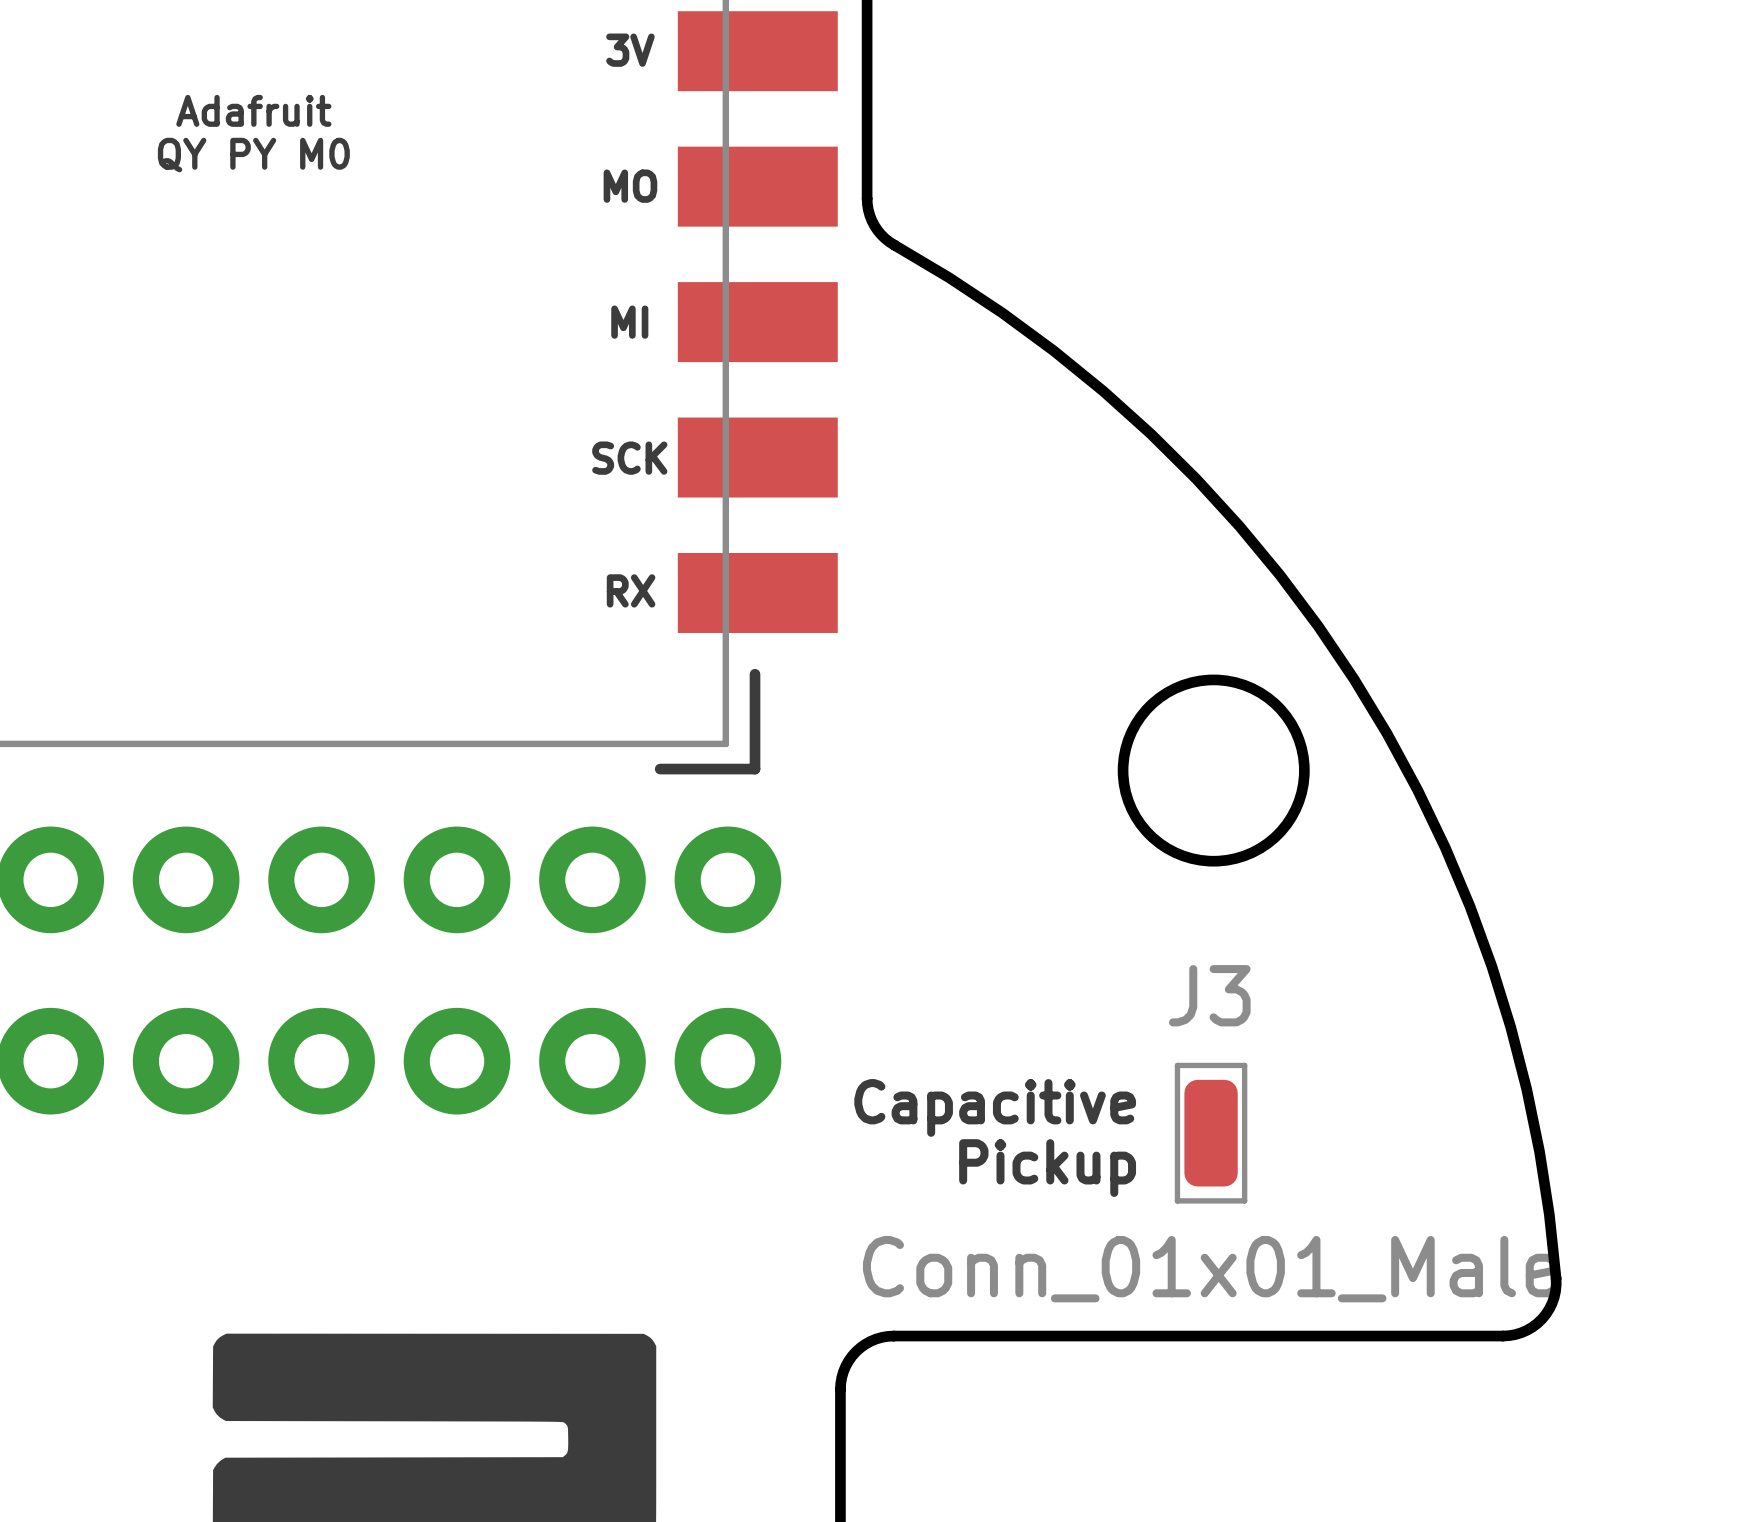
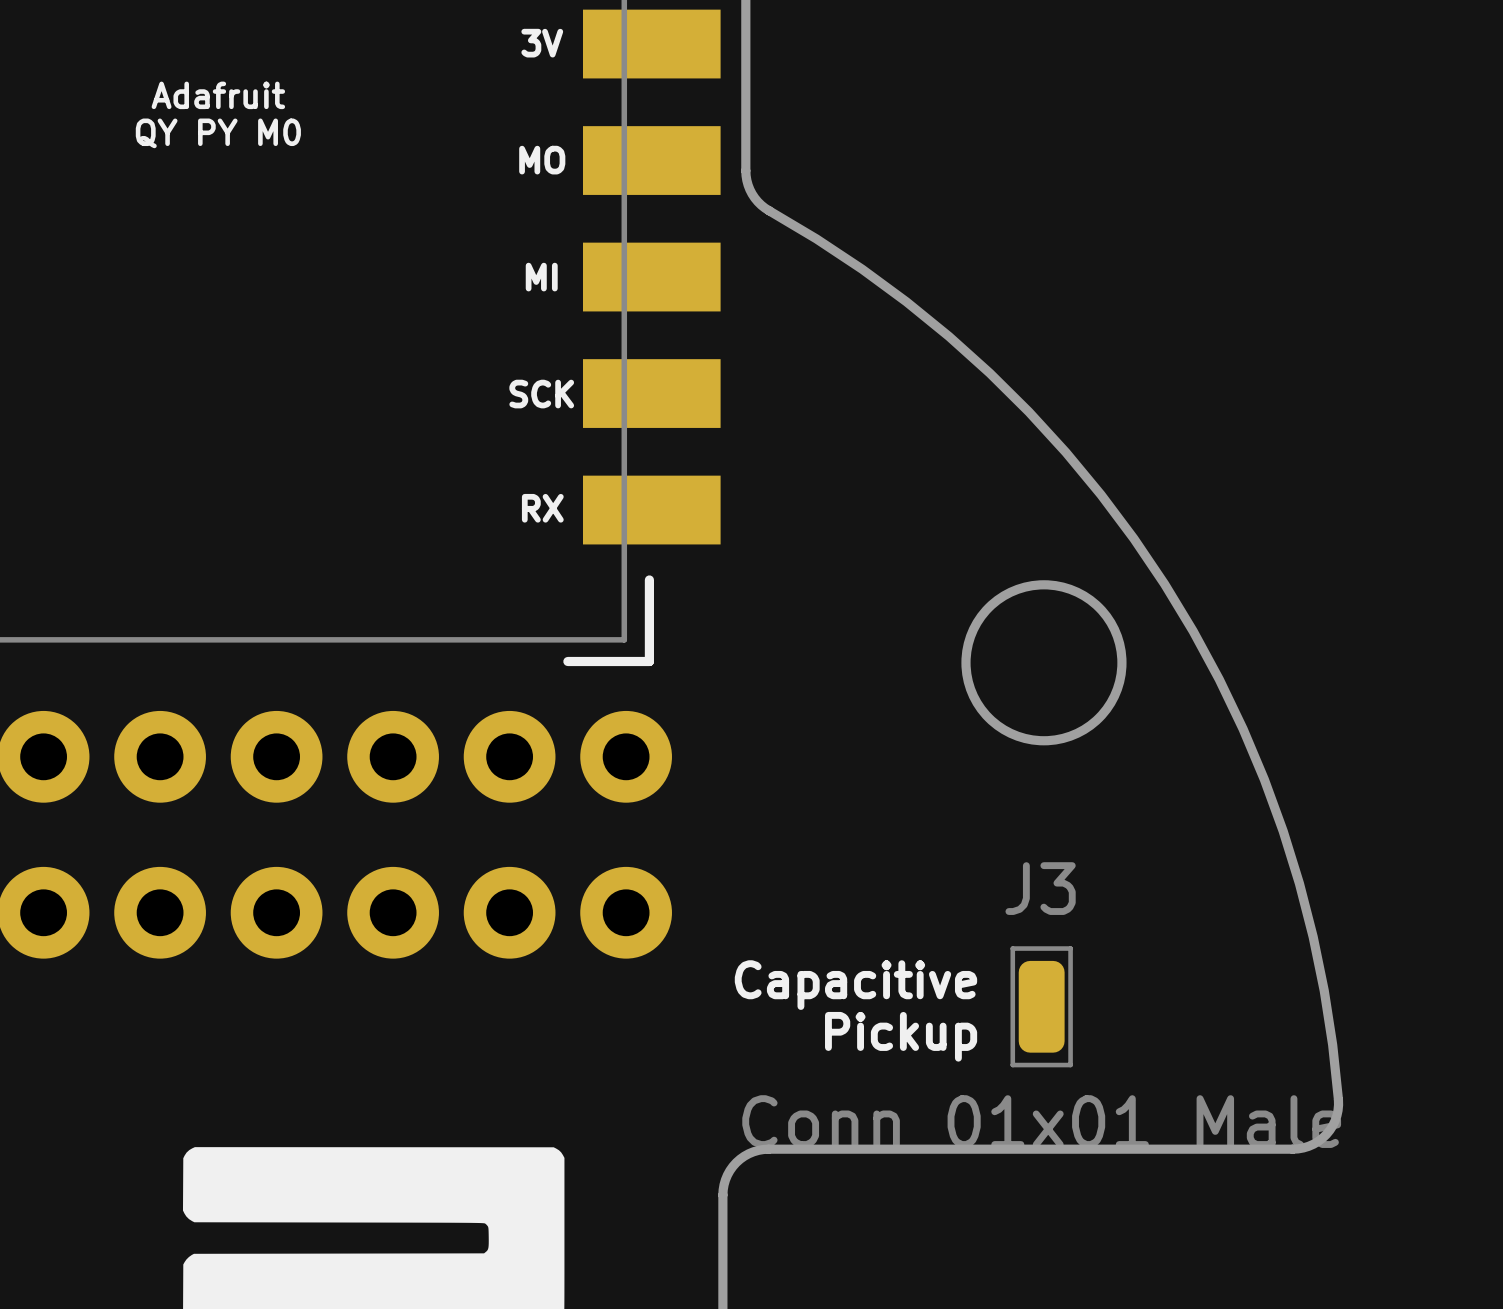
text position: Capacitive (995, 1107) -> Capacitive (855, 985)
J3 position: (1211, 1133) -> (1041, 1006)
text position: Pickup (1047, 1168) -> Pickup (901, 1036)

